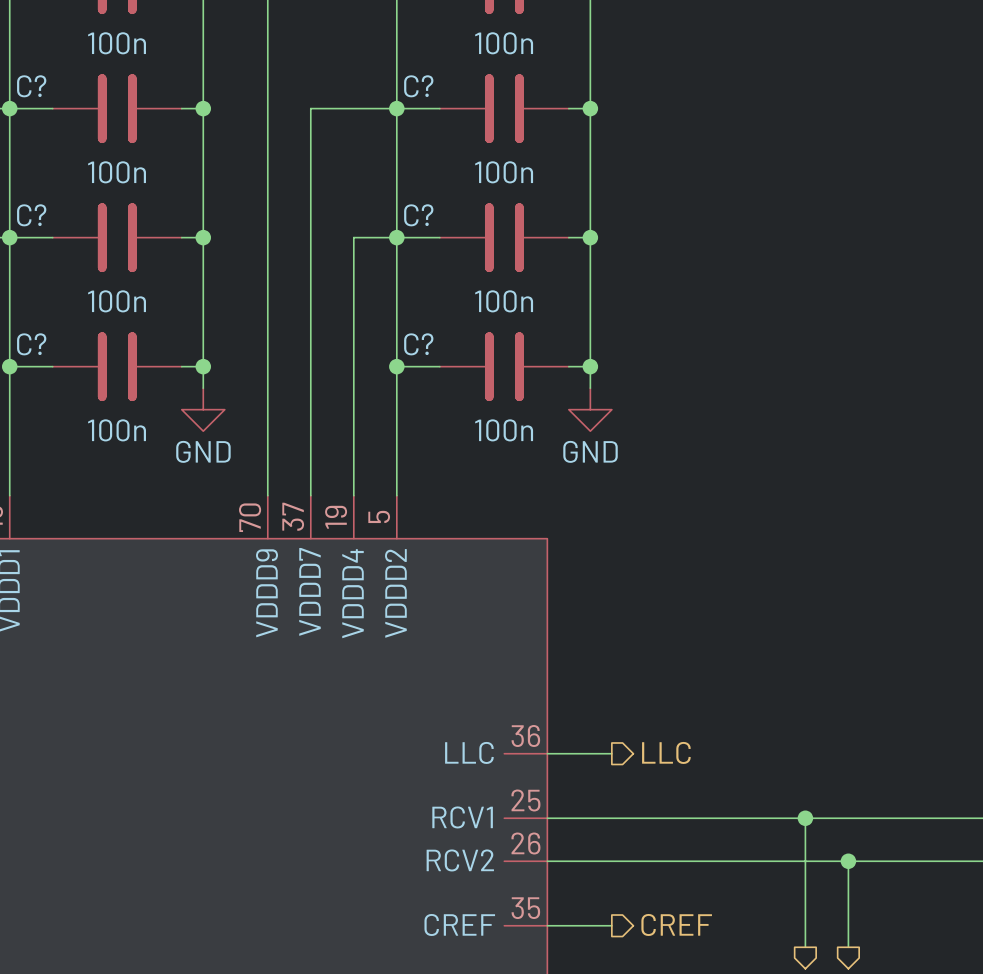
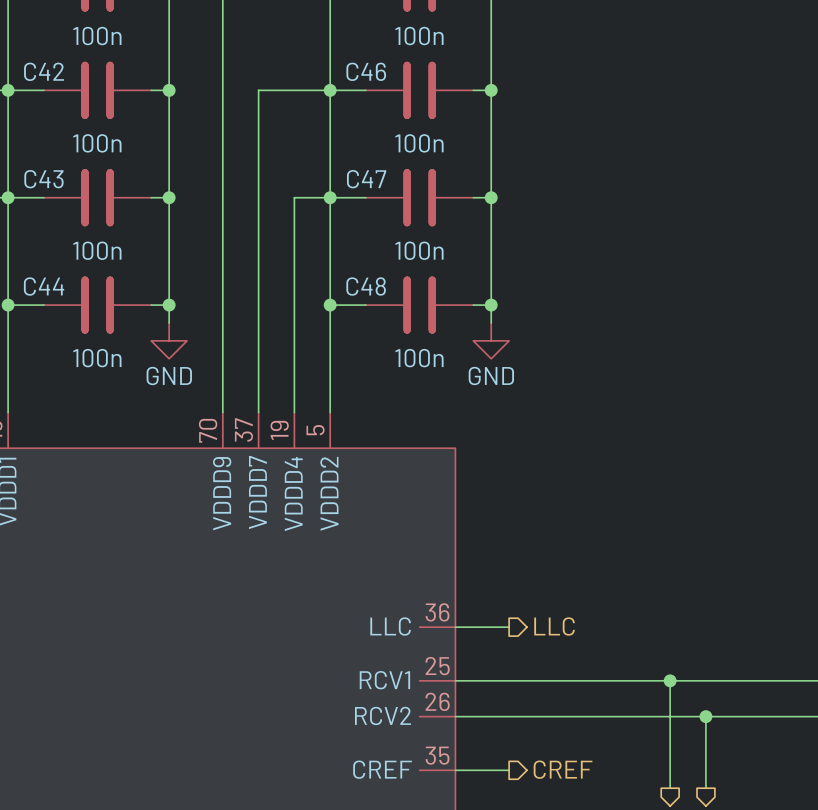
C? name: C? (31, 86) -> C42 (44, 71)
C? name: C? (418, 86) -> C46 (366, 71)
C? name: C? (31, 215) -> C43 (43, 179)
C? name: C? (418, 215) -> C47 (366, 179)
C? name: C? (31, 344) -> C44 (44, 286)
C? name: C? (418, 344) -> C48 (366, 286)

